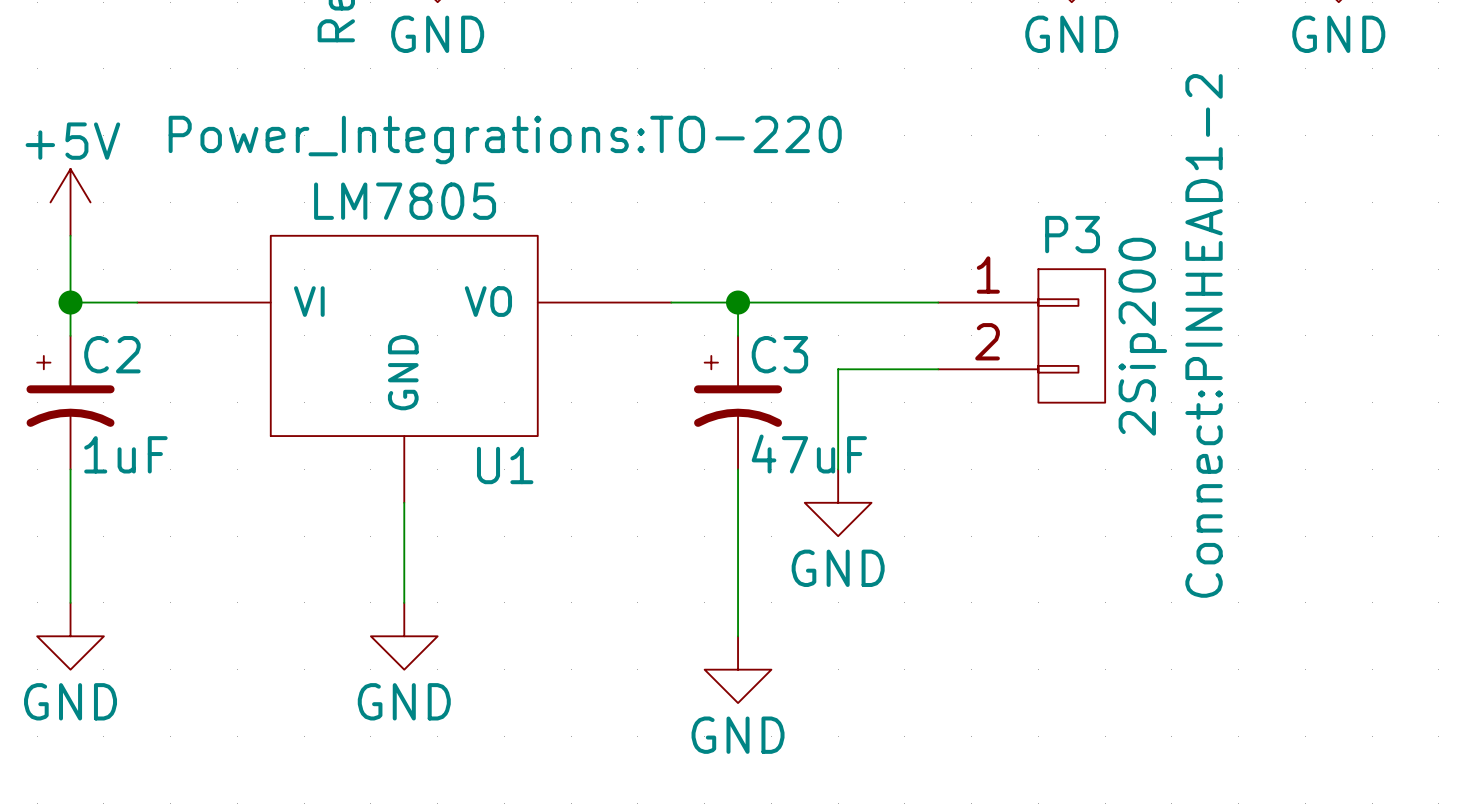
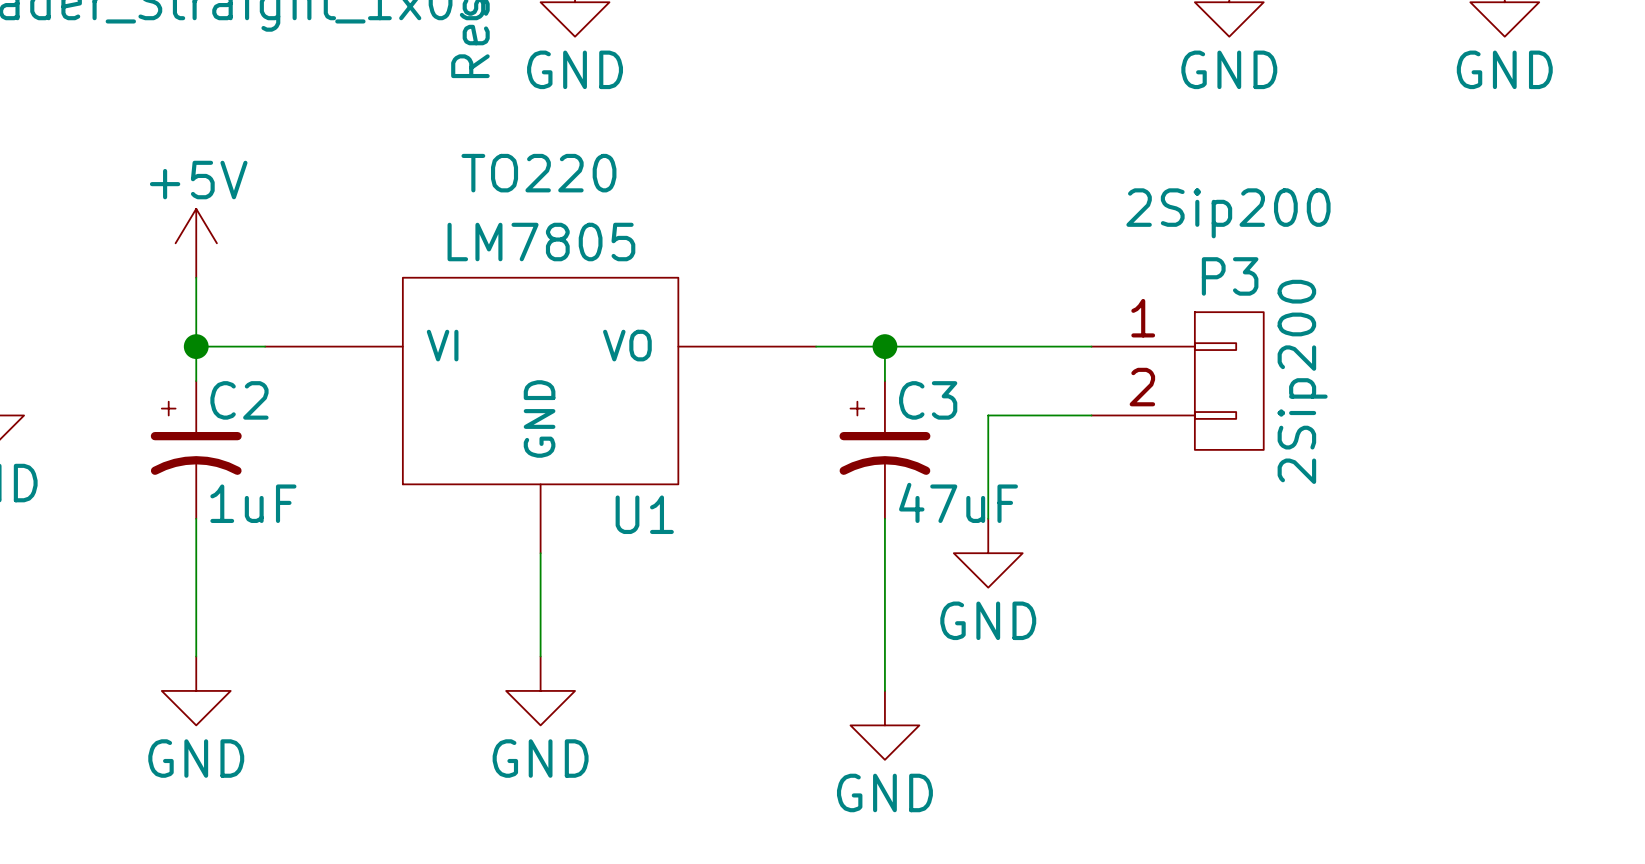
U1 text: Power_Integrations:TO-220 (505, 139) -> TO220 (538, 173)
P3 text: Connect:PINHEAD1-2 (1204, 335) -> 2Sip200 (1228, 213)

